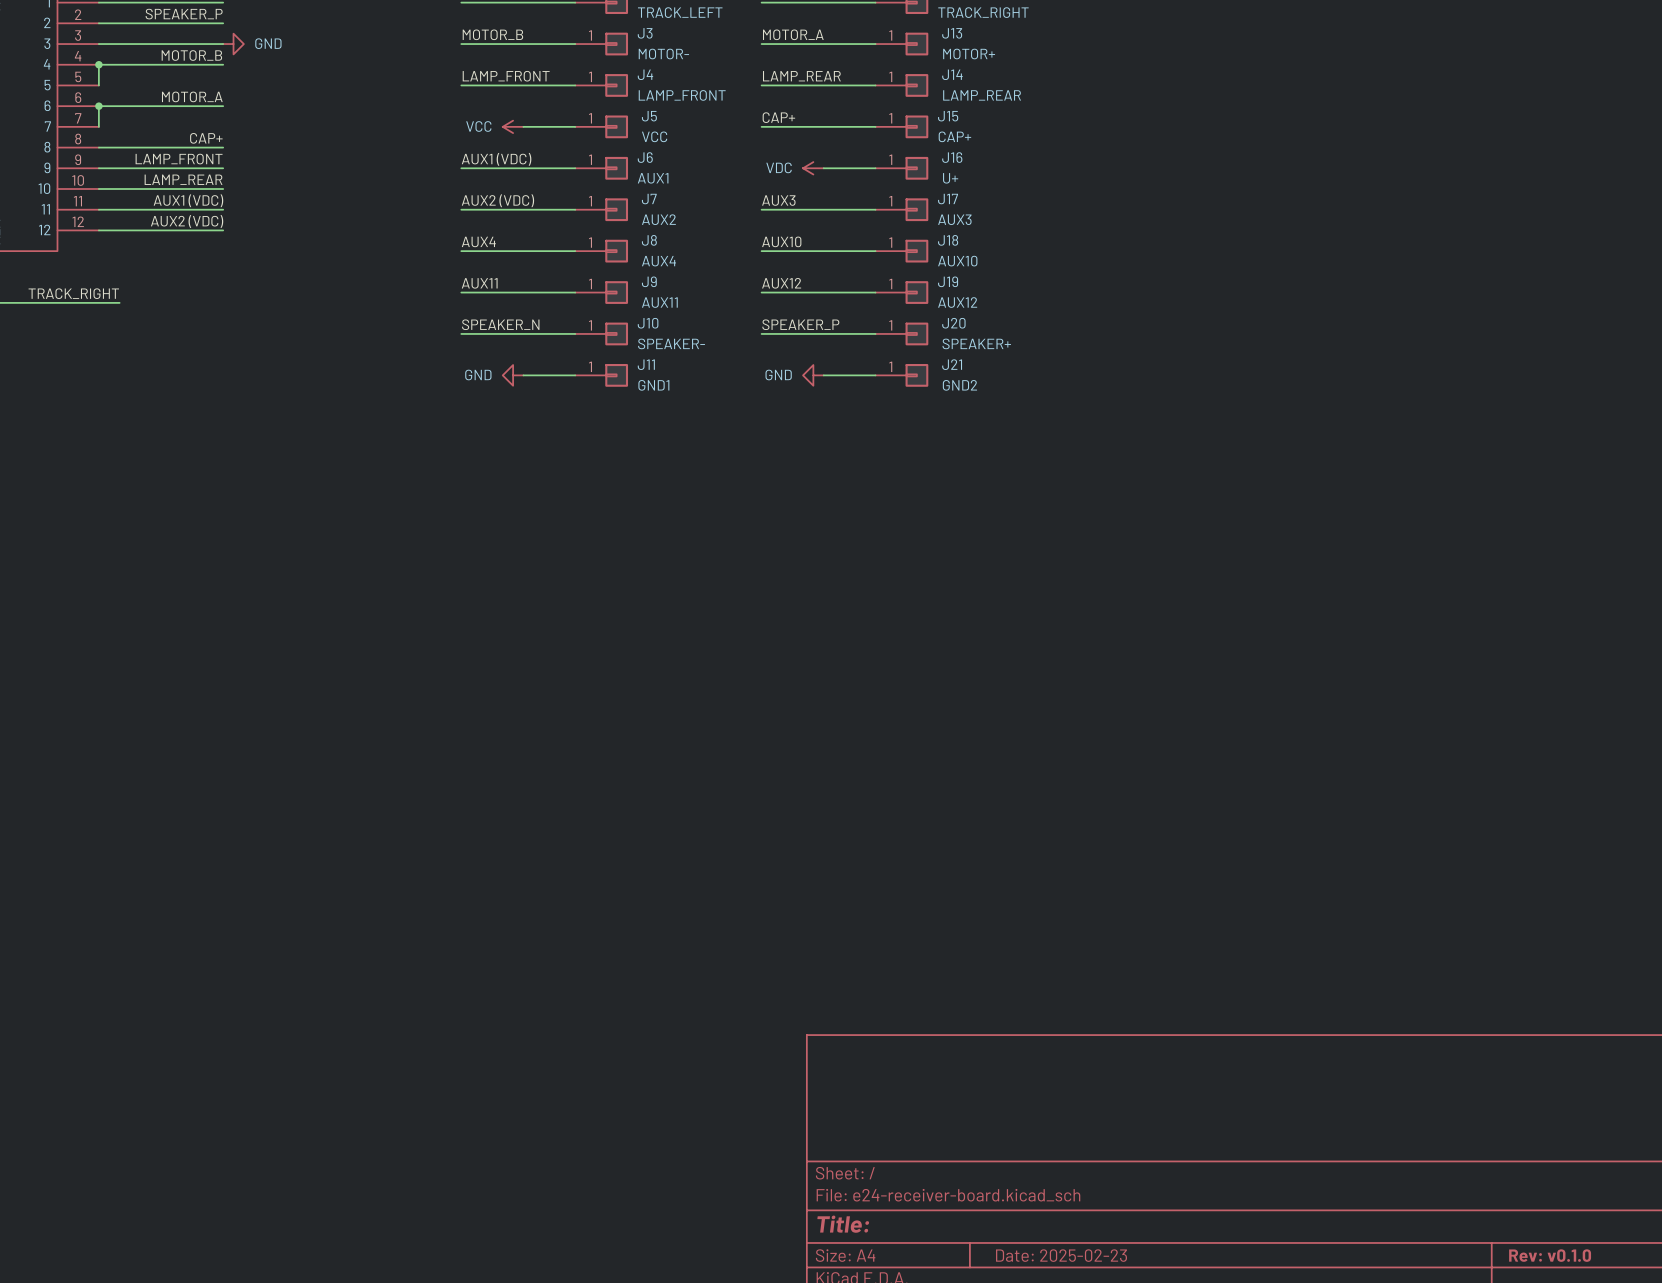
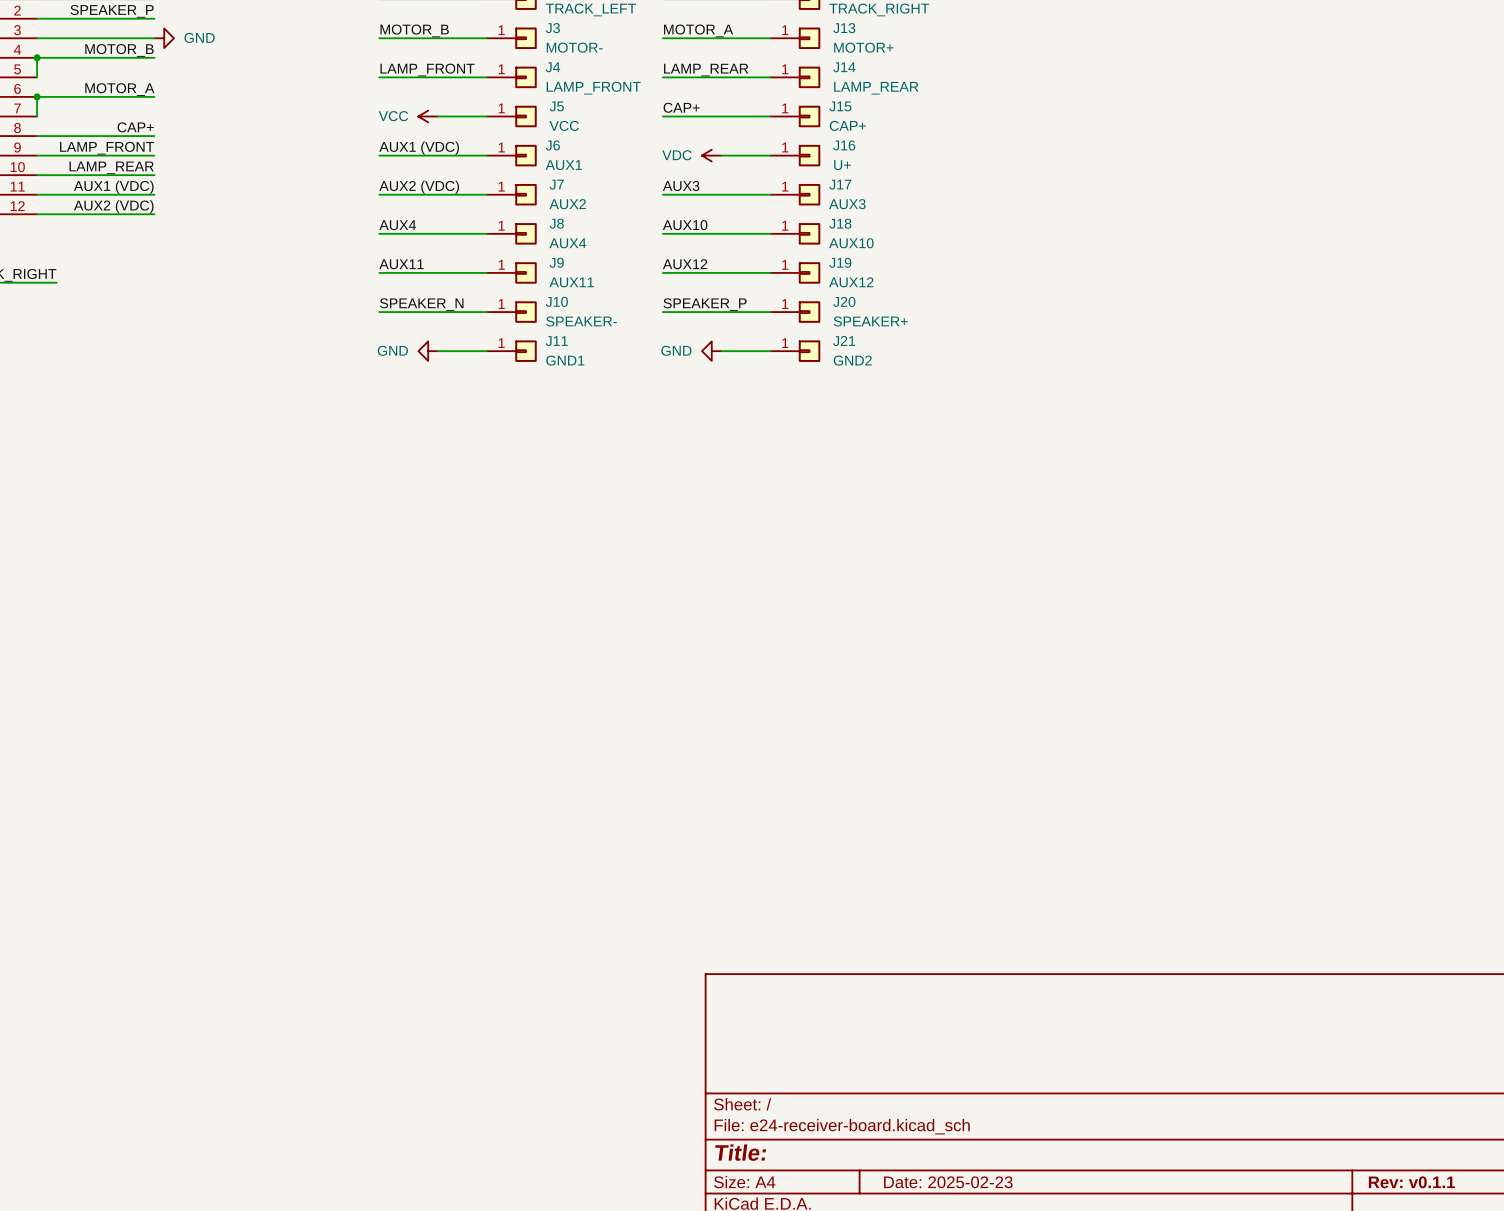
title block: Rev: v0.1.0 (1550, 1255) -> Rev: v0.1.1 (1411, 1182)

